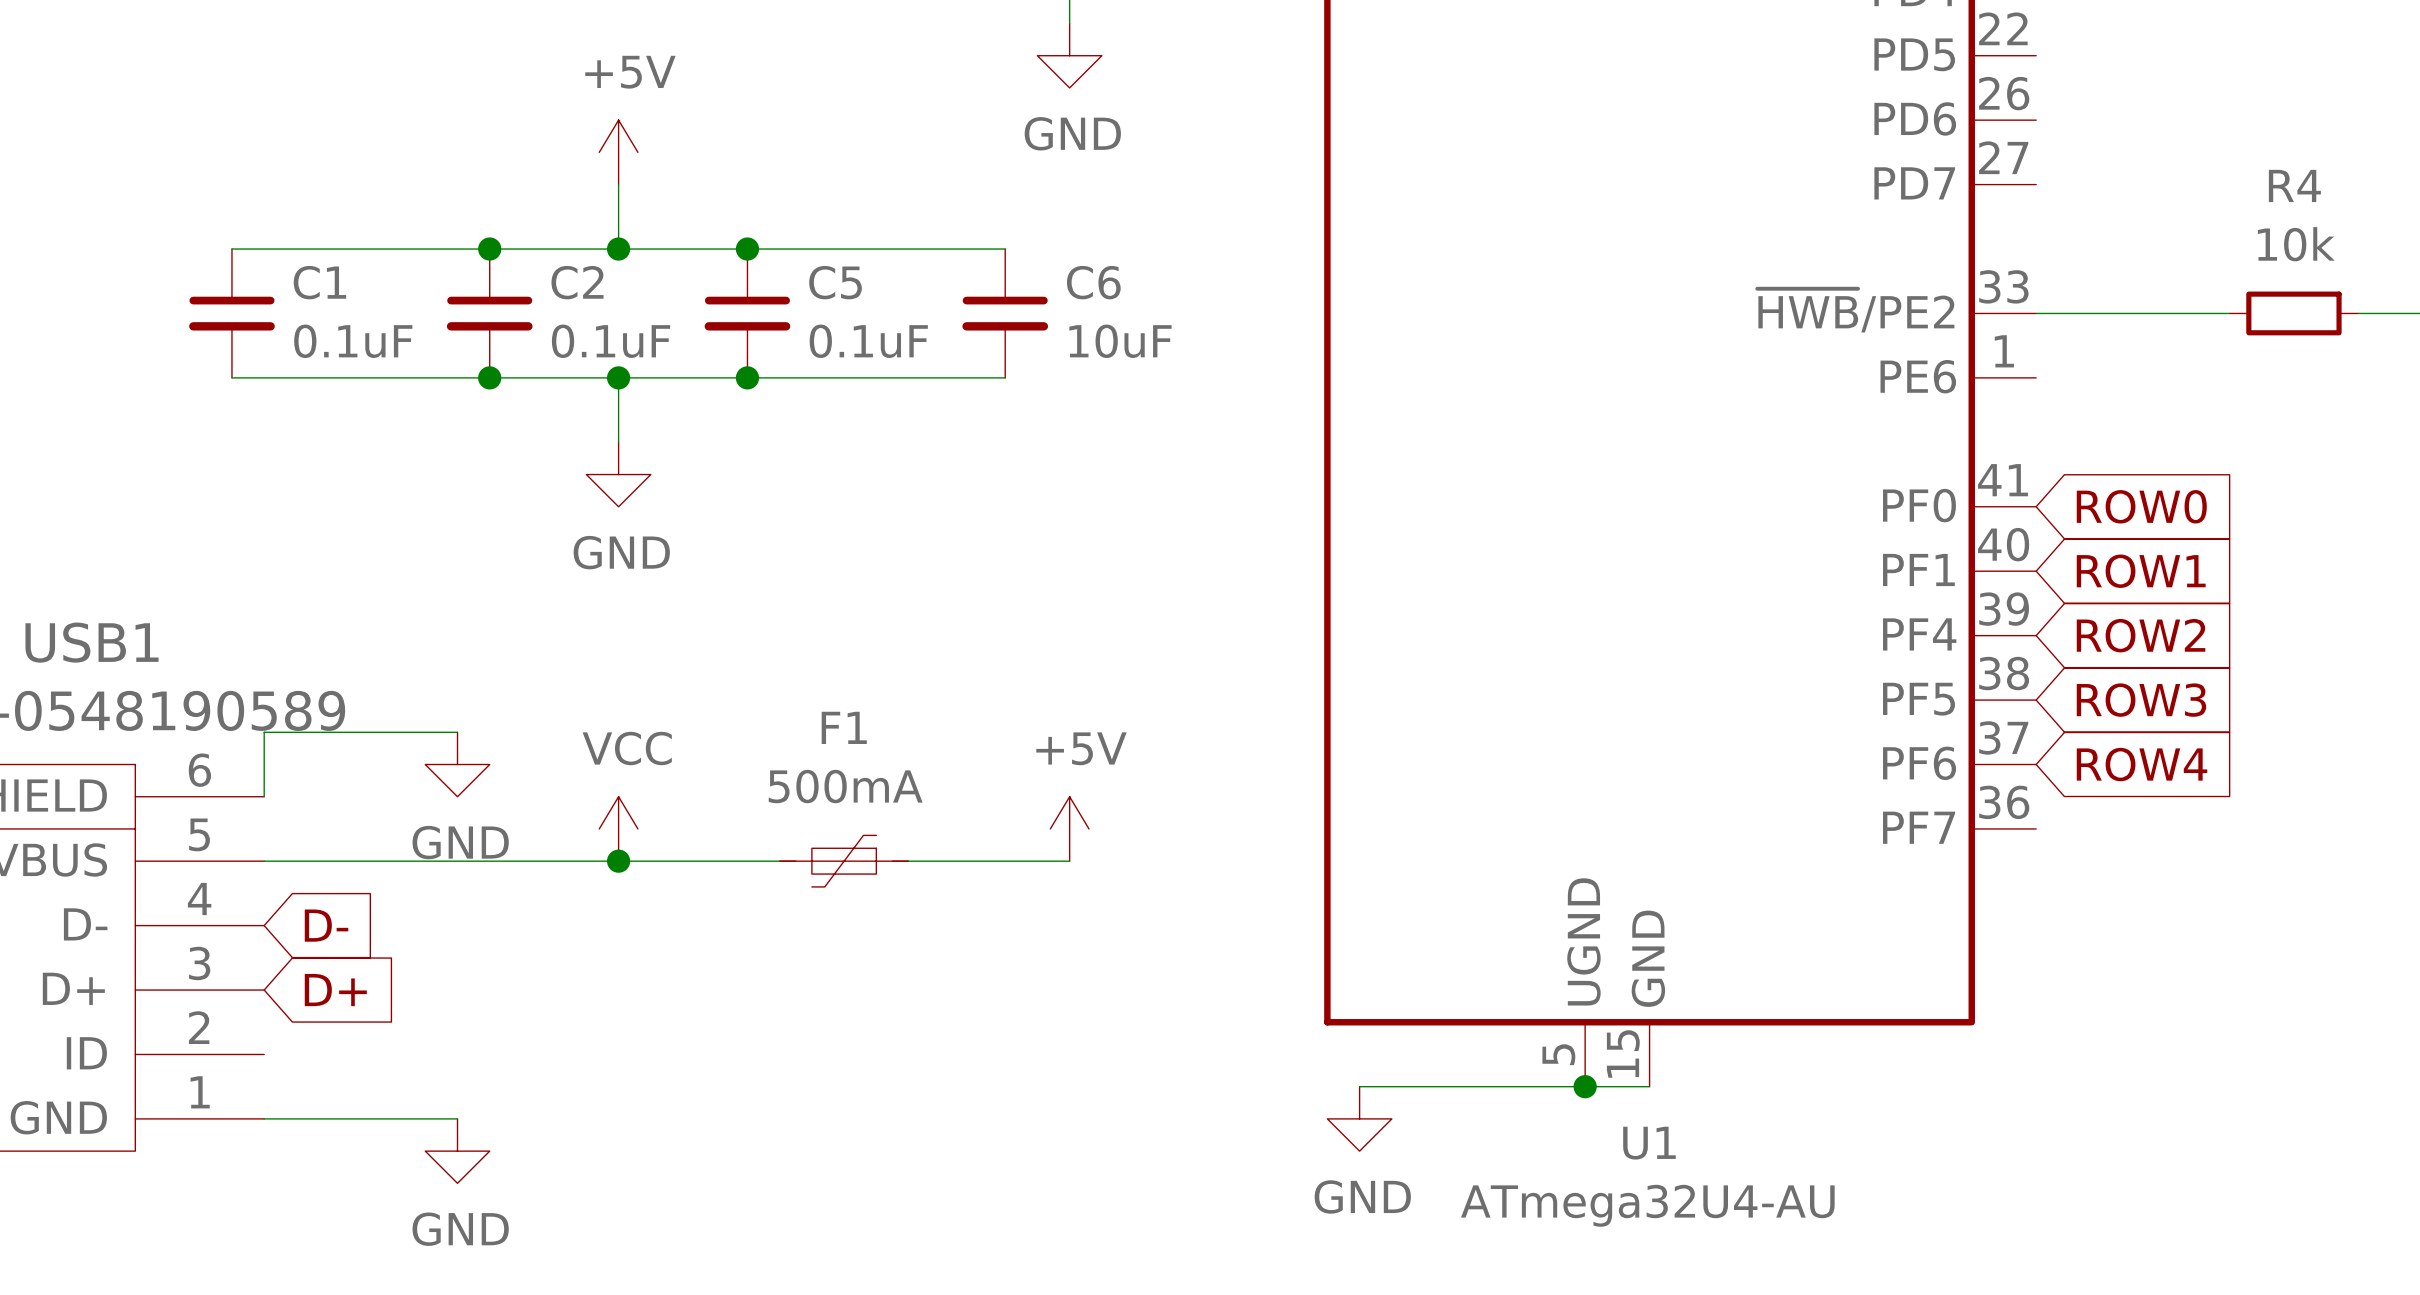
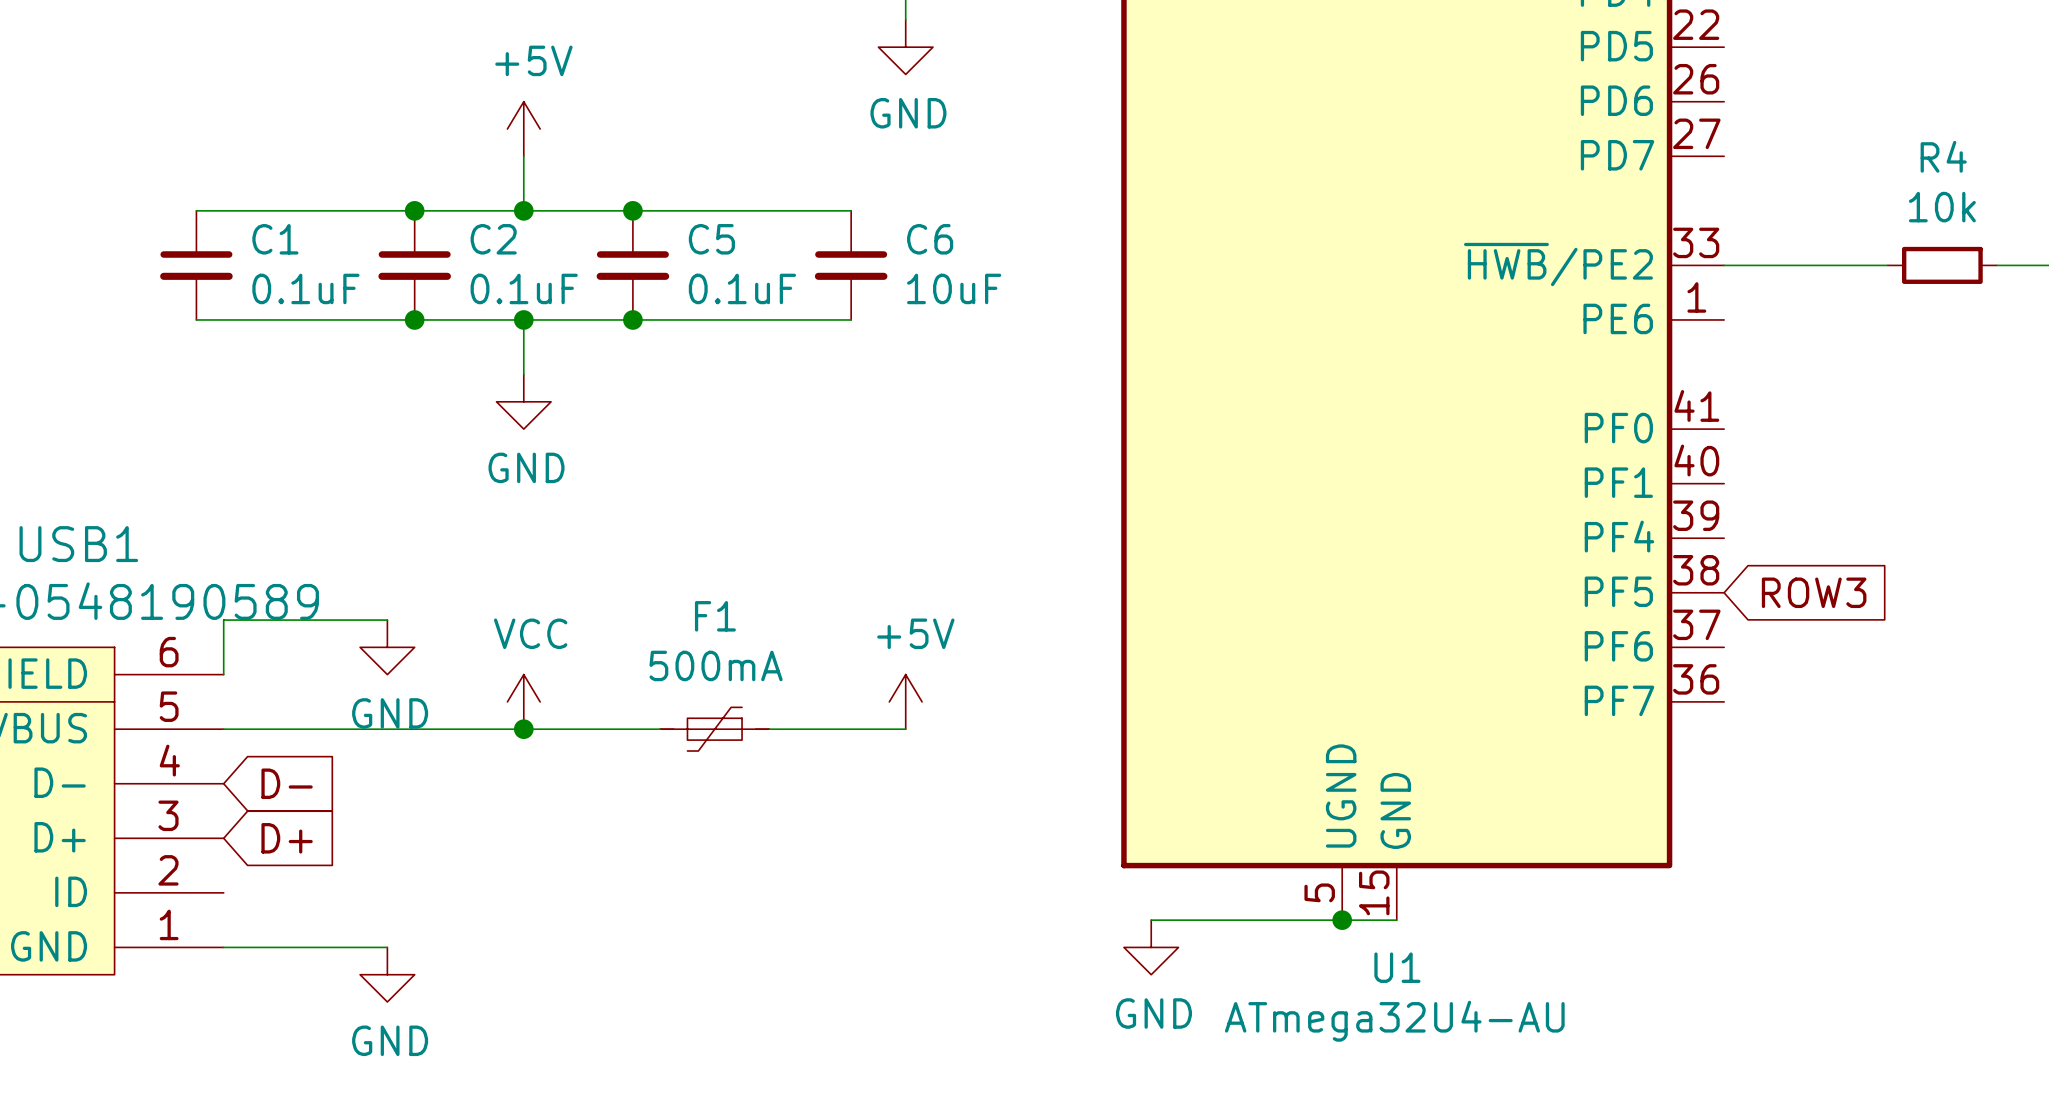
global label: ROW0 (2141, 506) -> none
global label: ROW1 (2141, 571) -> none
global label: ROW2 (2141, 635) -> none
global label: ROW4 (2142, 764) -> none

